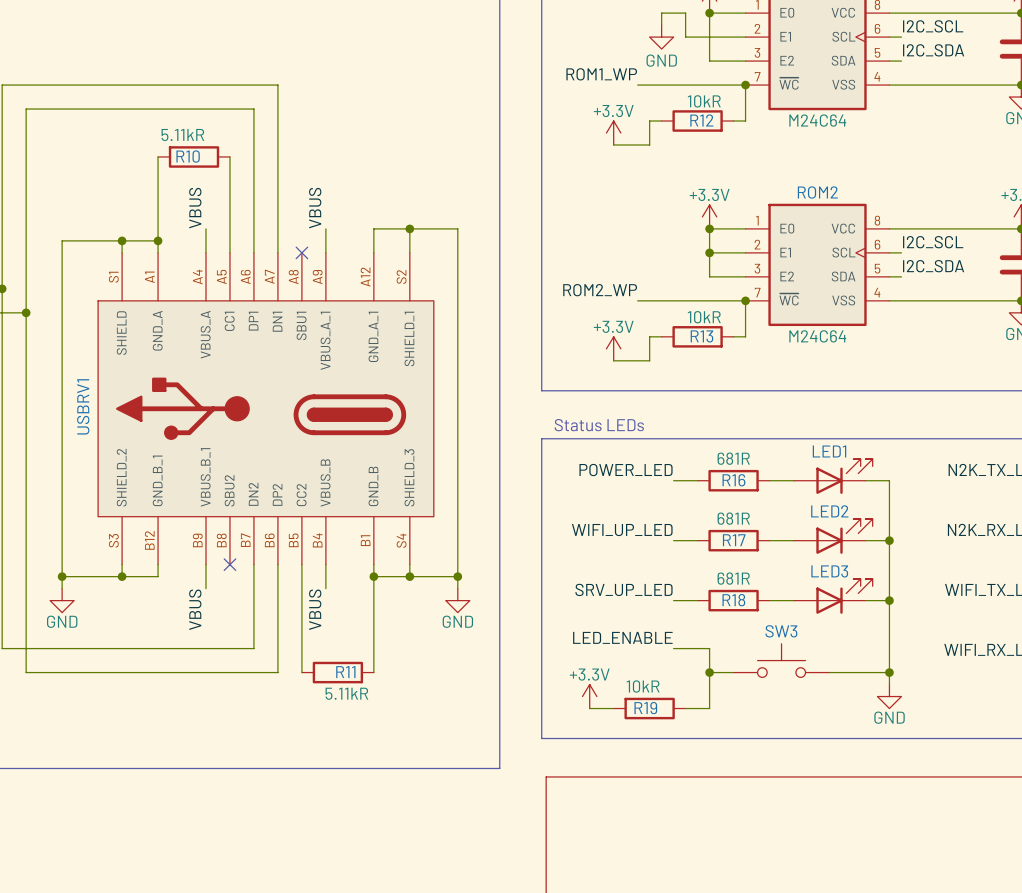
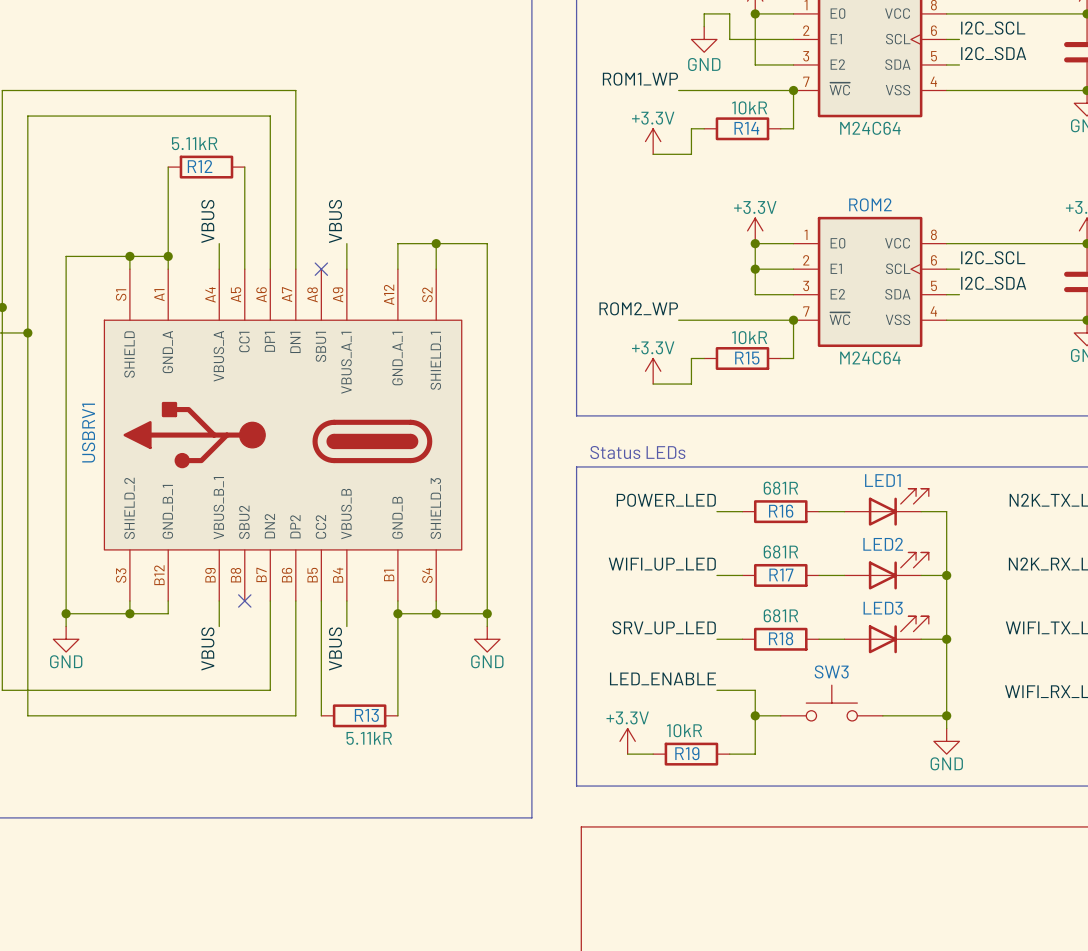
R12 name: R12 (701, 120) -> R14 (746, 128)
R10 name: R10 (188, 156) -> R12 (200, 166)
R13 name: R13 (701, 336) -> R15 (747, 358)
R11 name: R11 (345, 672) -> R13 (366, 715)

